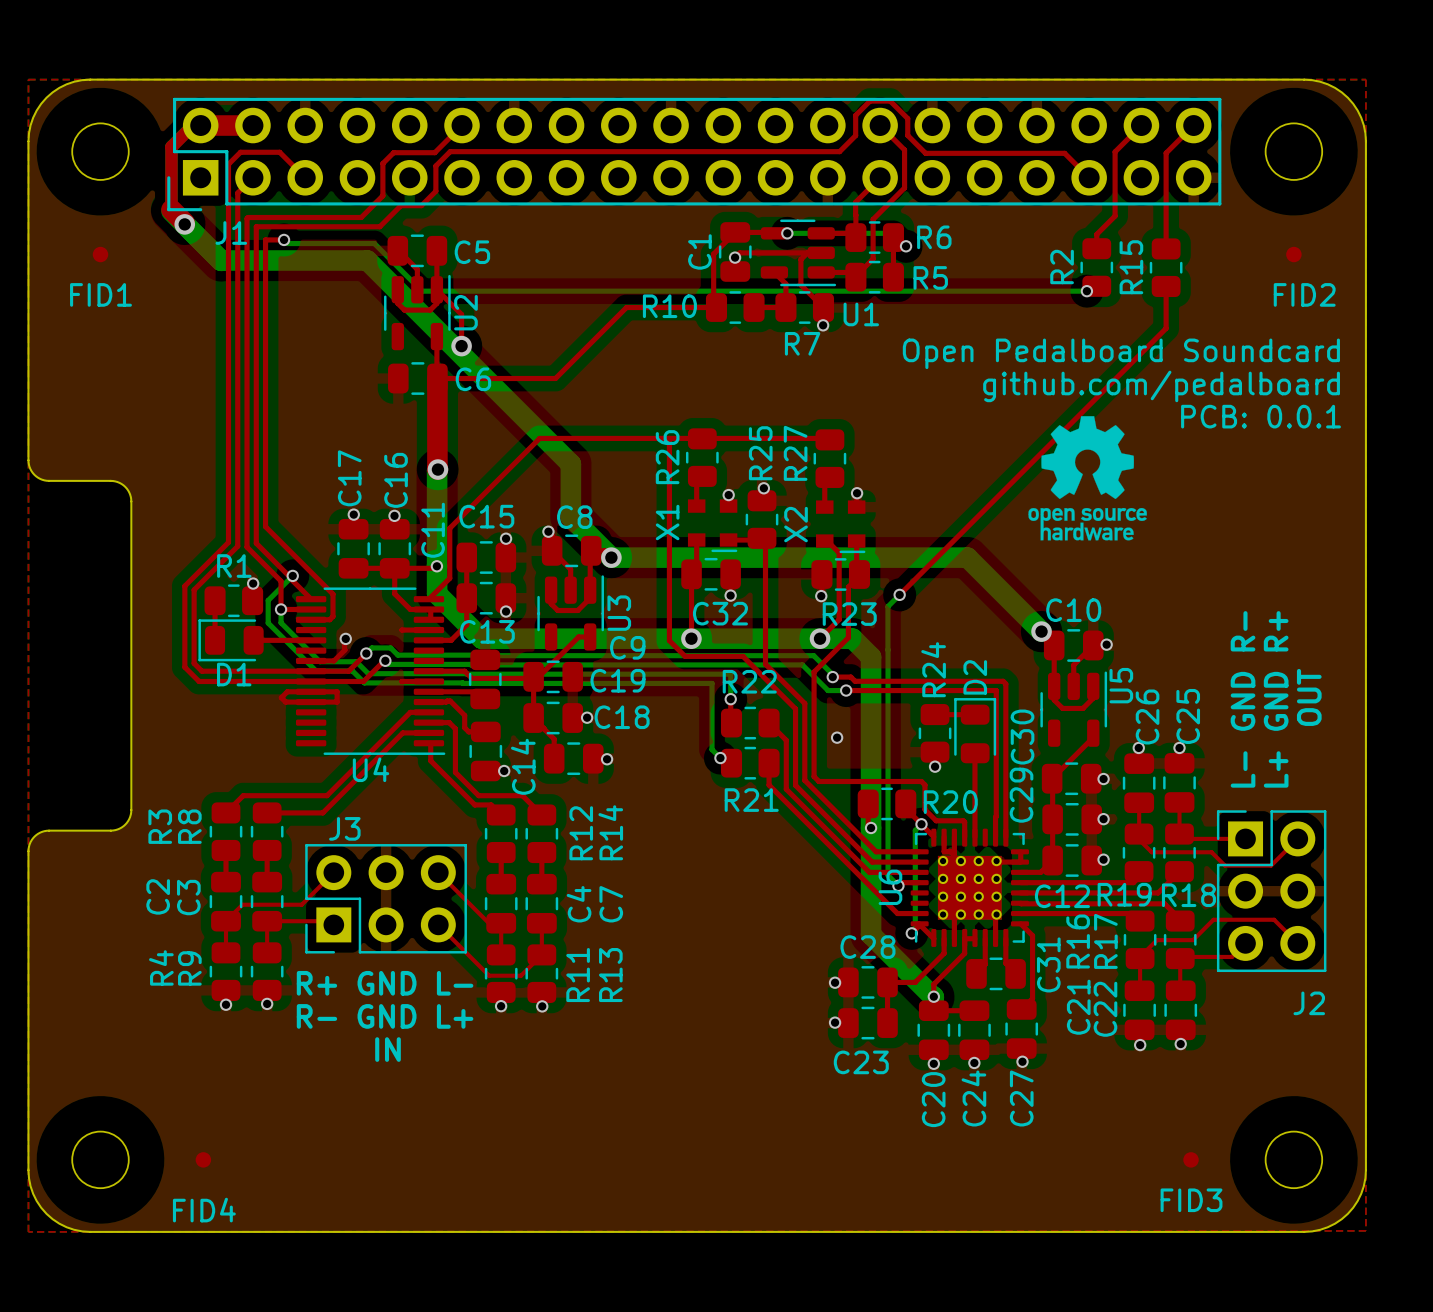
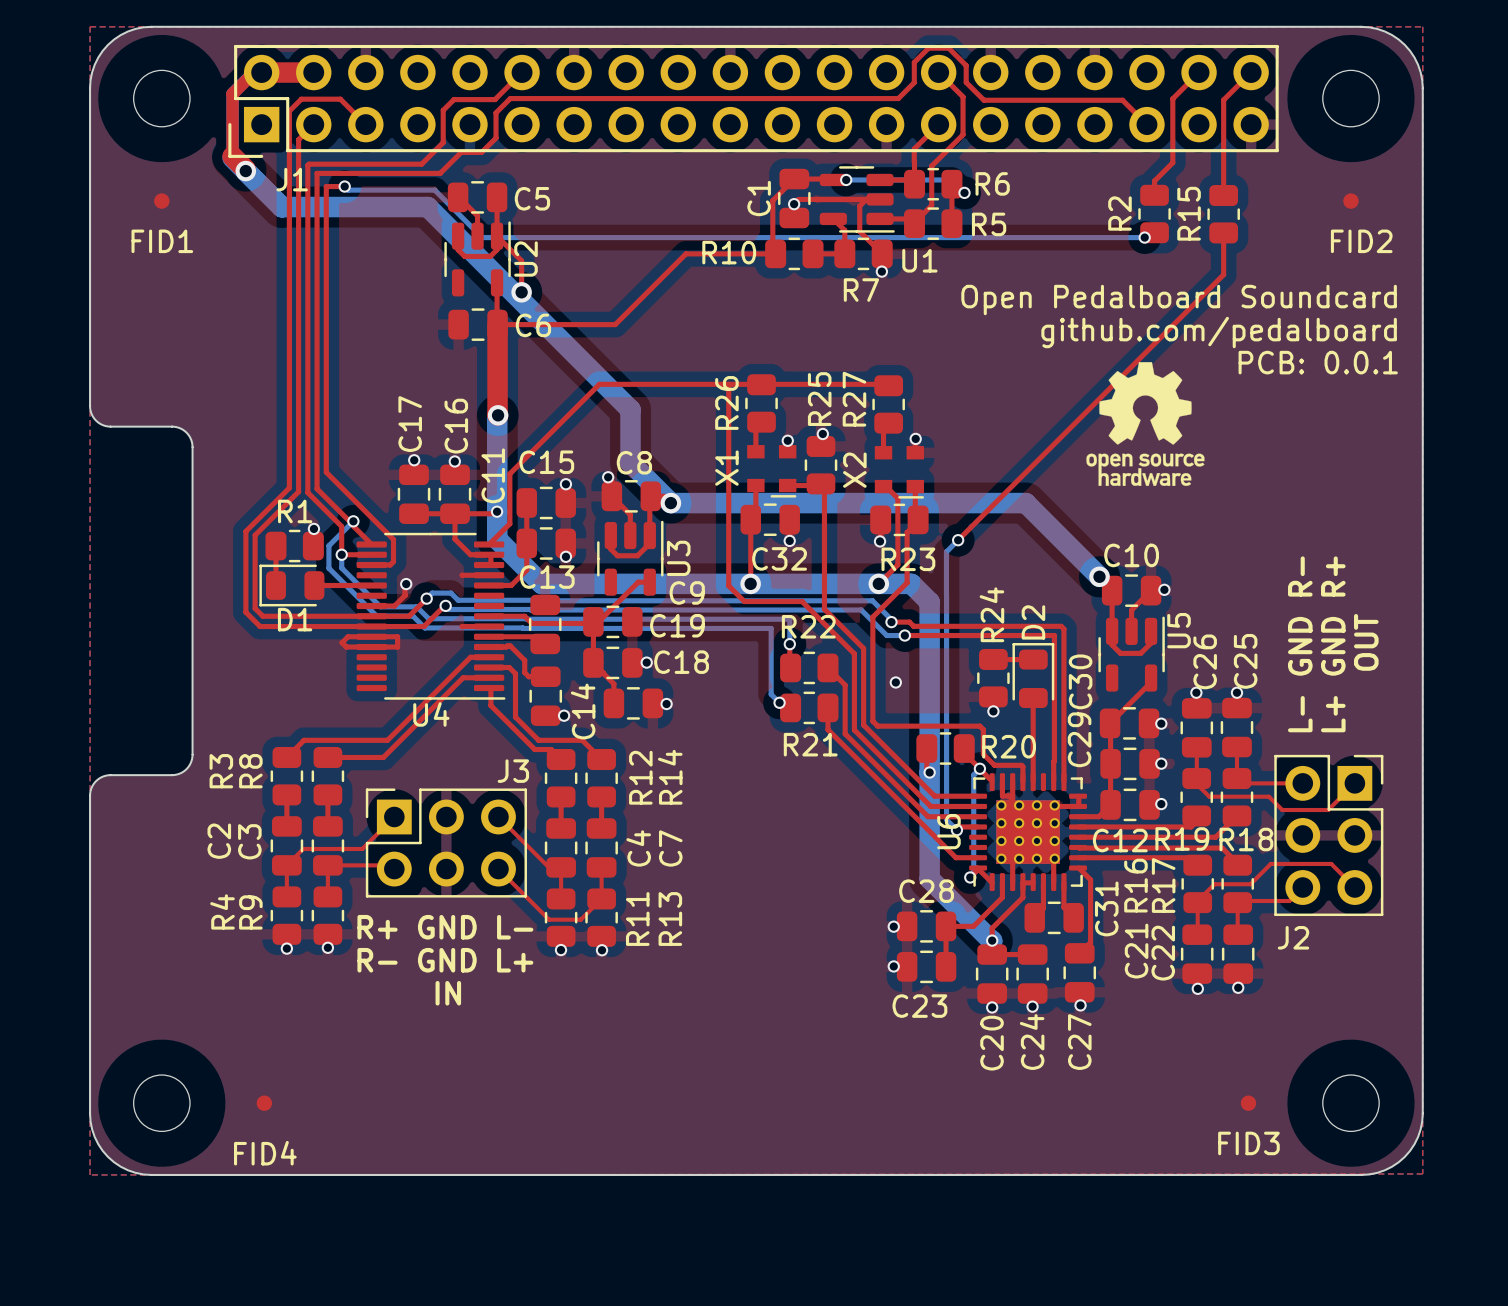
J2 footprint: [1216, 810, 1327, 973] -> [1274, 754, 1384, 917]
J3 name position: J3 (344, 828) -> J3 (513, 771)
J3 footprint: [305, 844, 467, 954] -> [365, 788, 527, 898]
J2 name position: J2 (1309, 1003) -> J2 (1293, 937)

